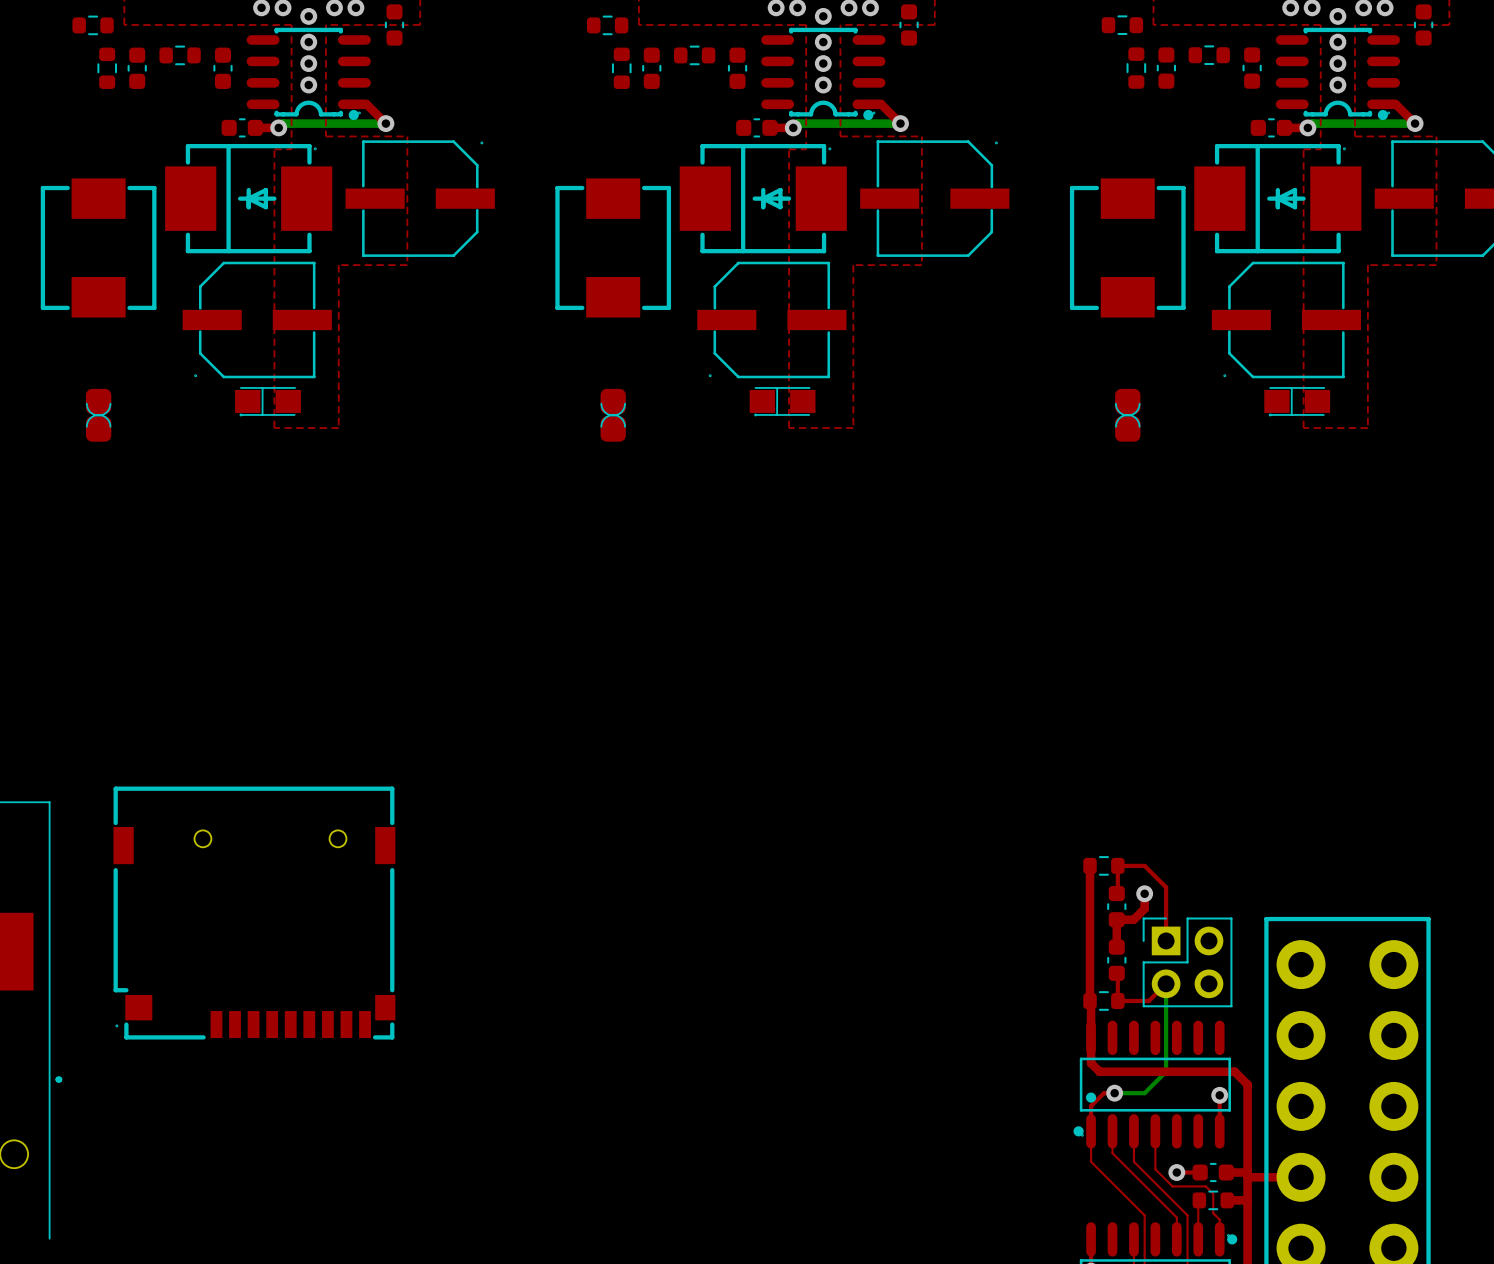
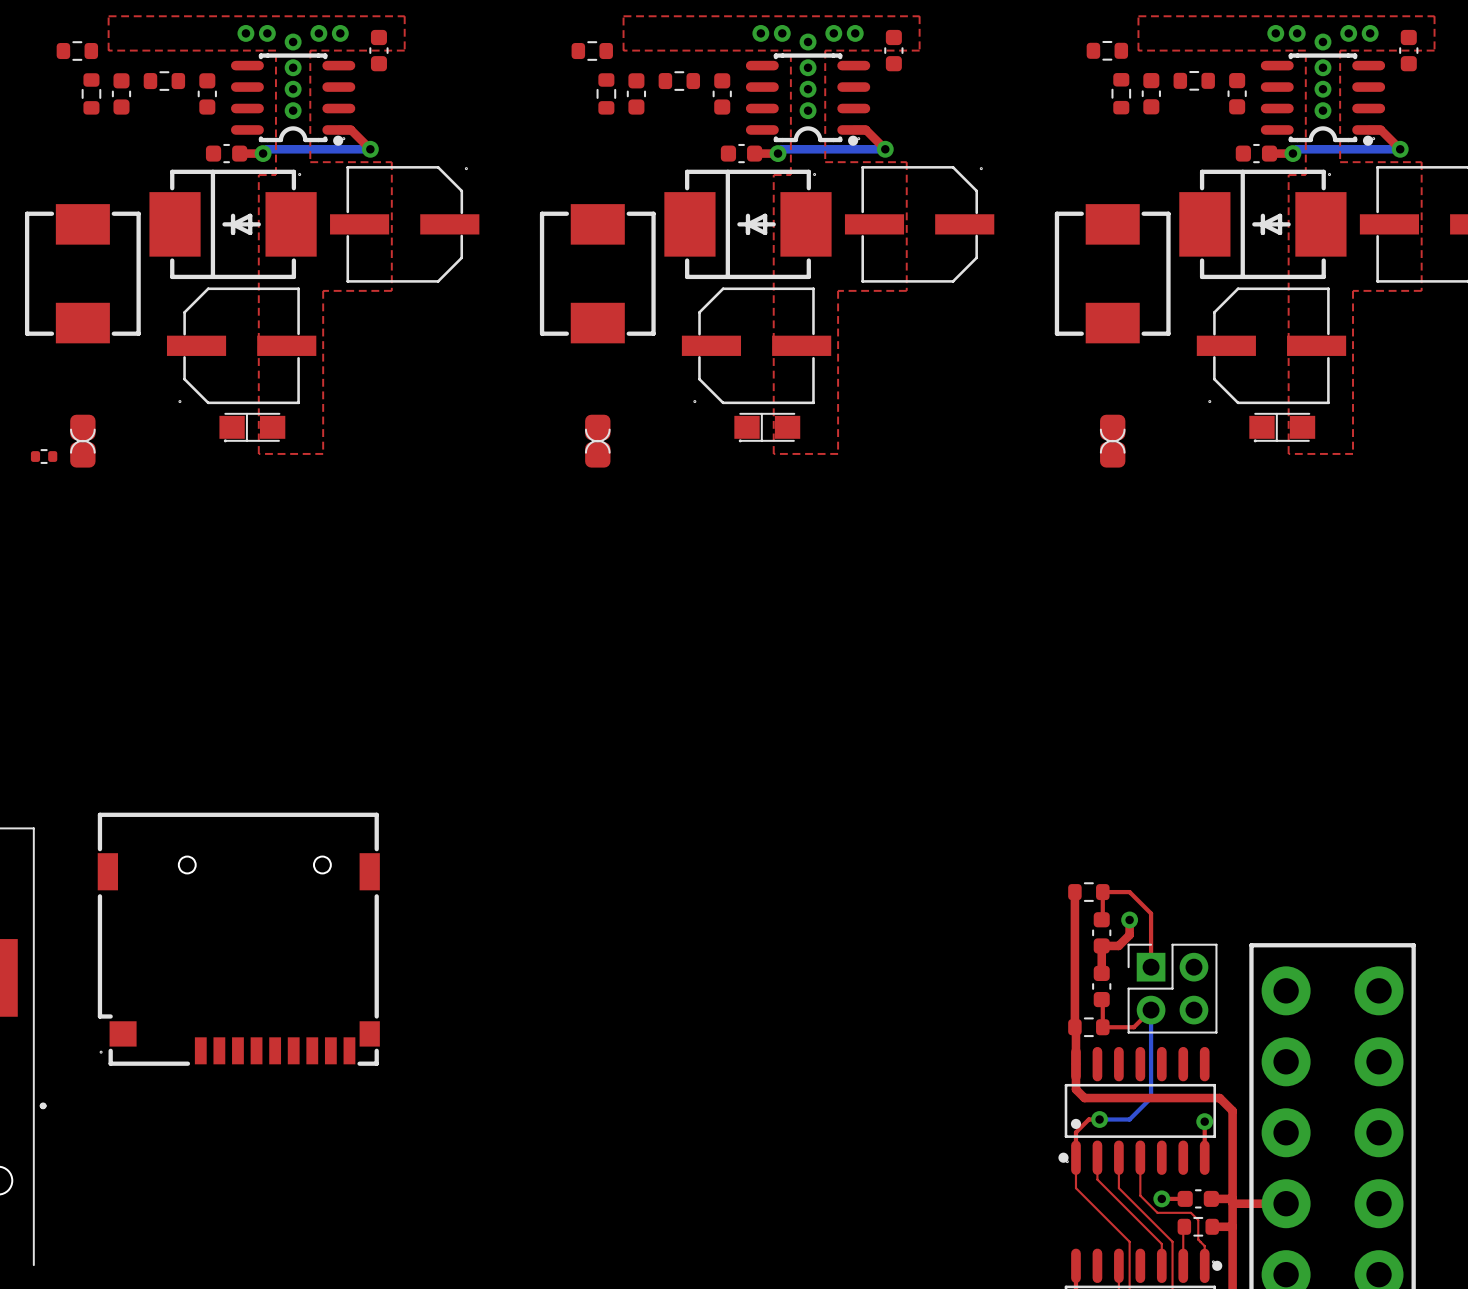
part: none -> (44, 456)

